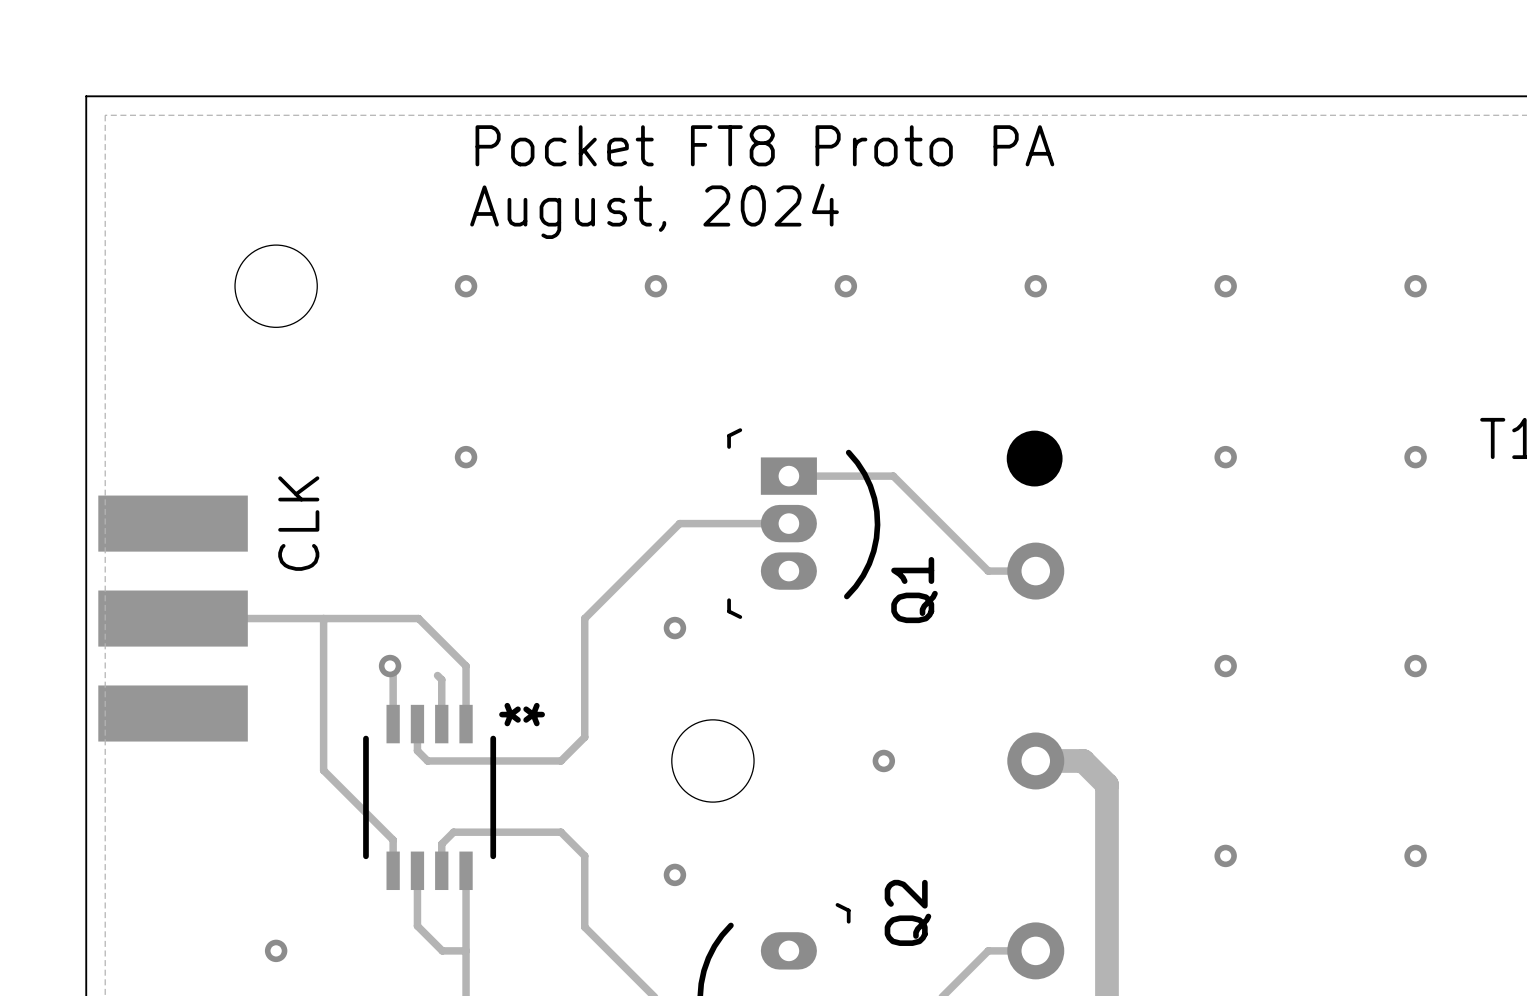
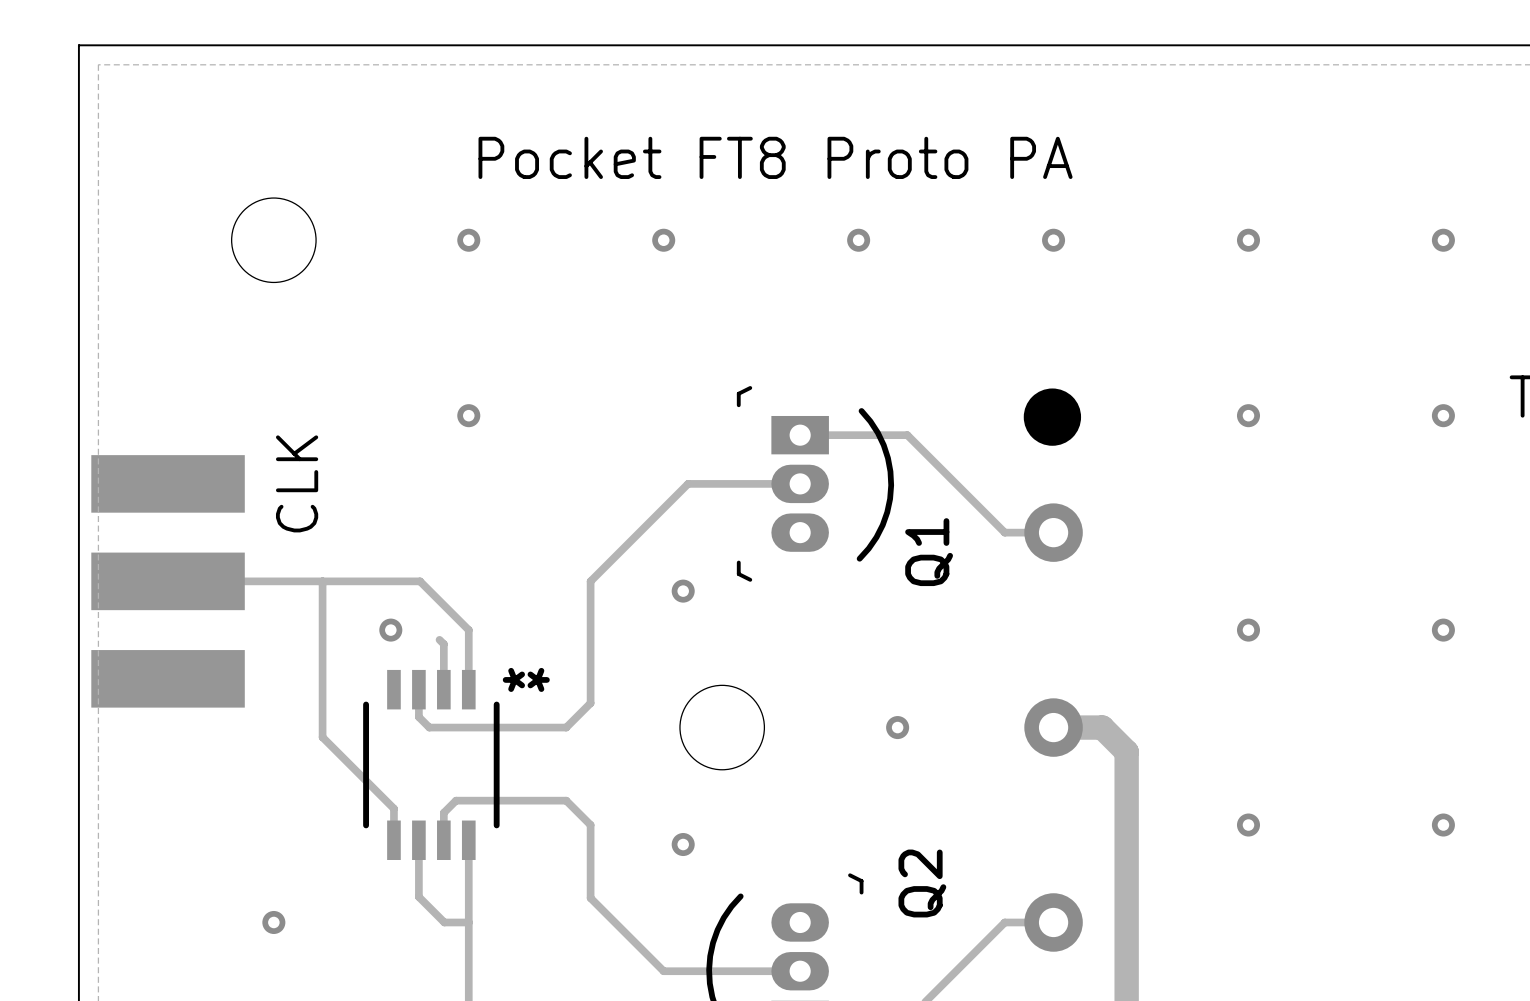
text: Pocket FT8 Proto PA (764, 145) -> none
text: August, 2024 (654, 211) -> Pocket FT8 Proto PA (775, 157)
track: (390, 666) (393, 669) (393, 724) -> none

